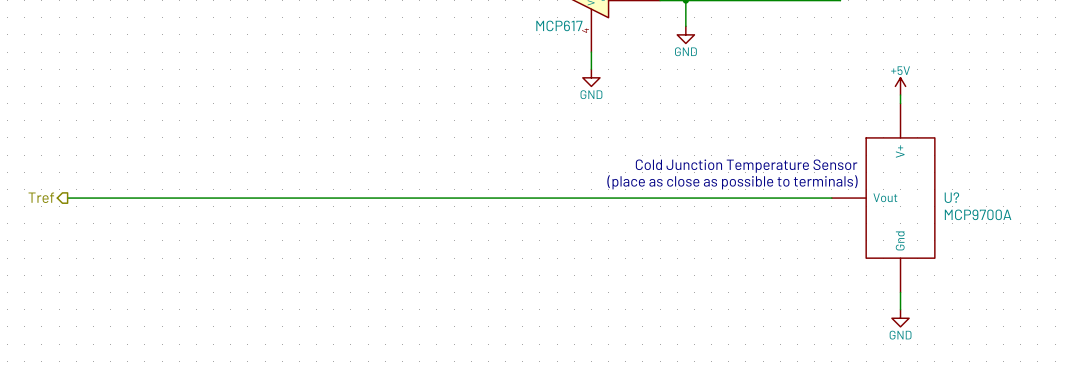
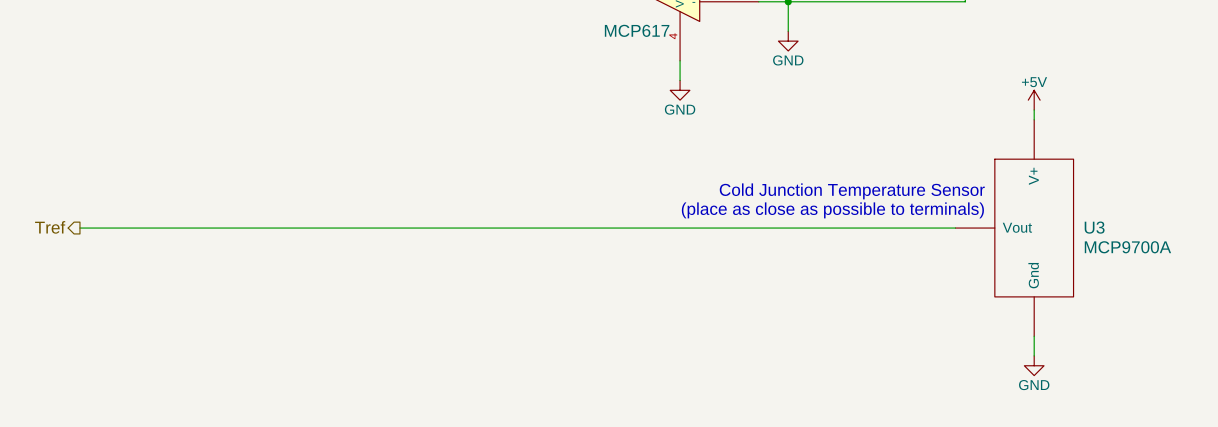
U? name: U? (951, 197) -> U3 (1094, 227)

